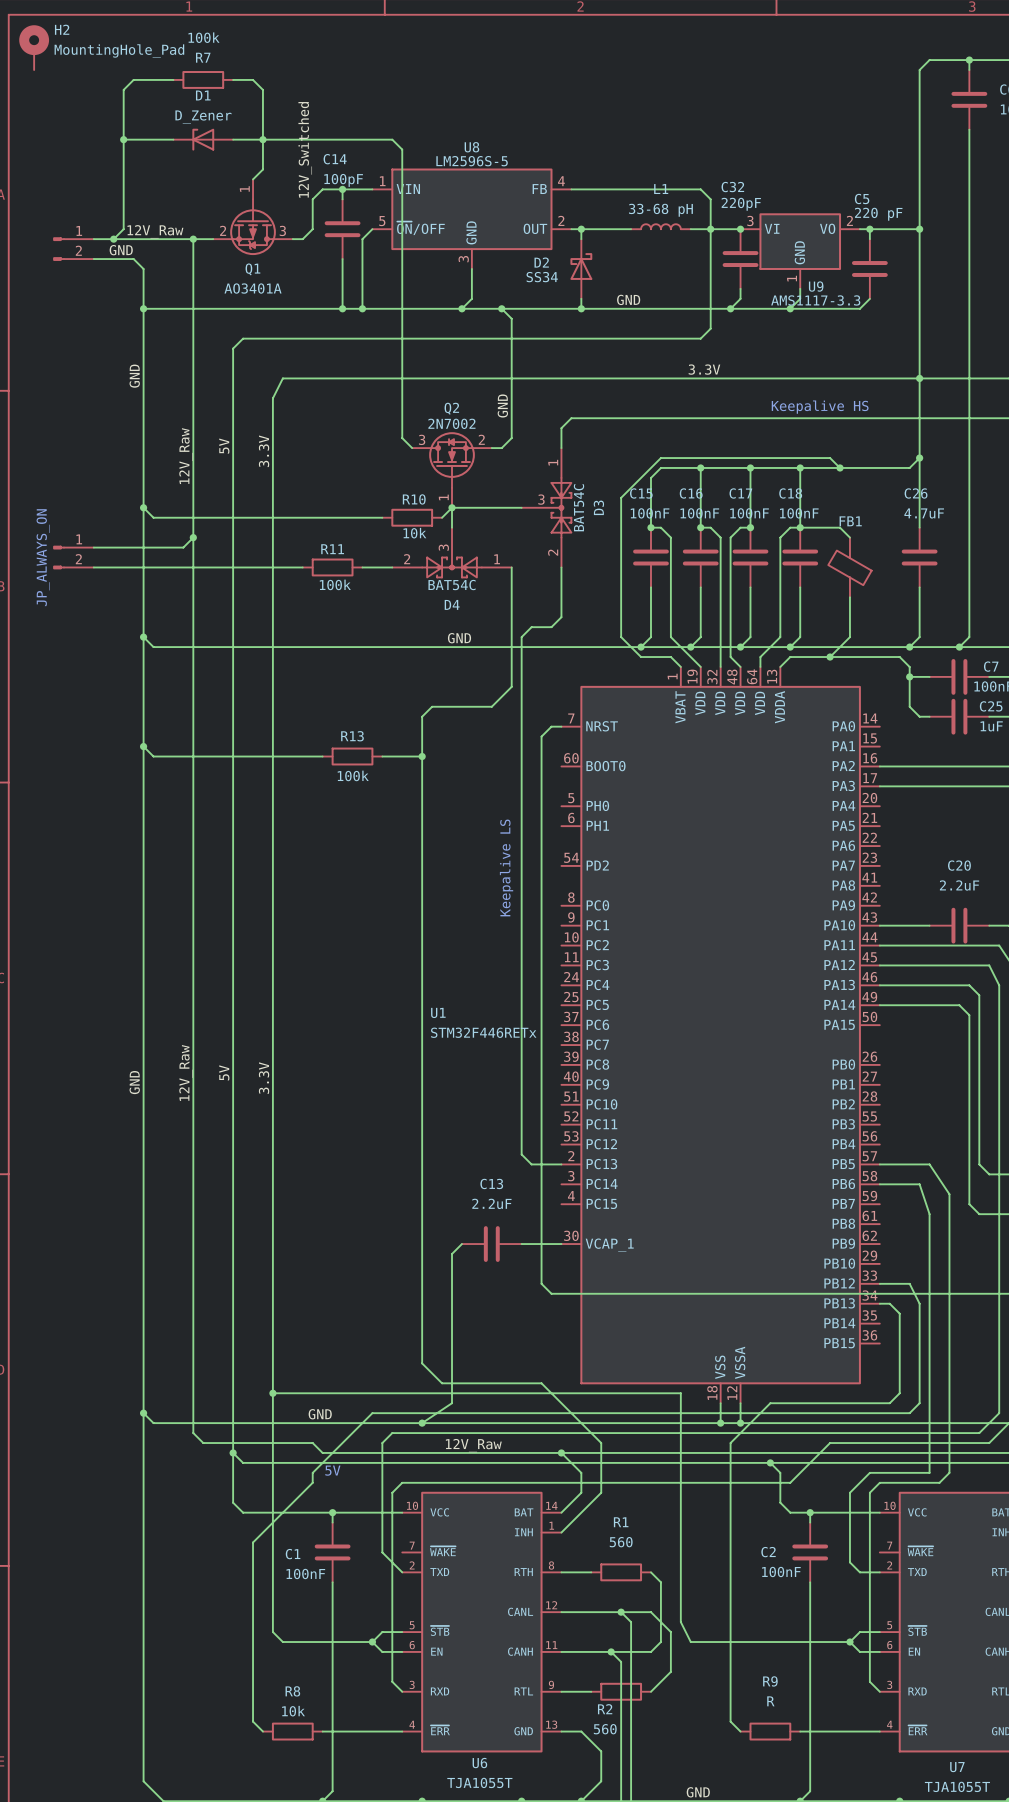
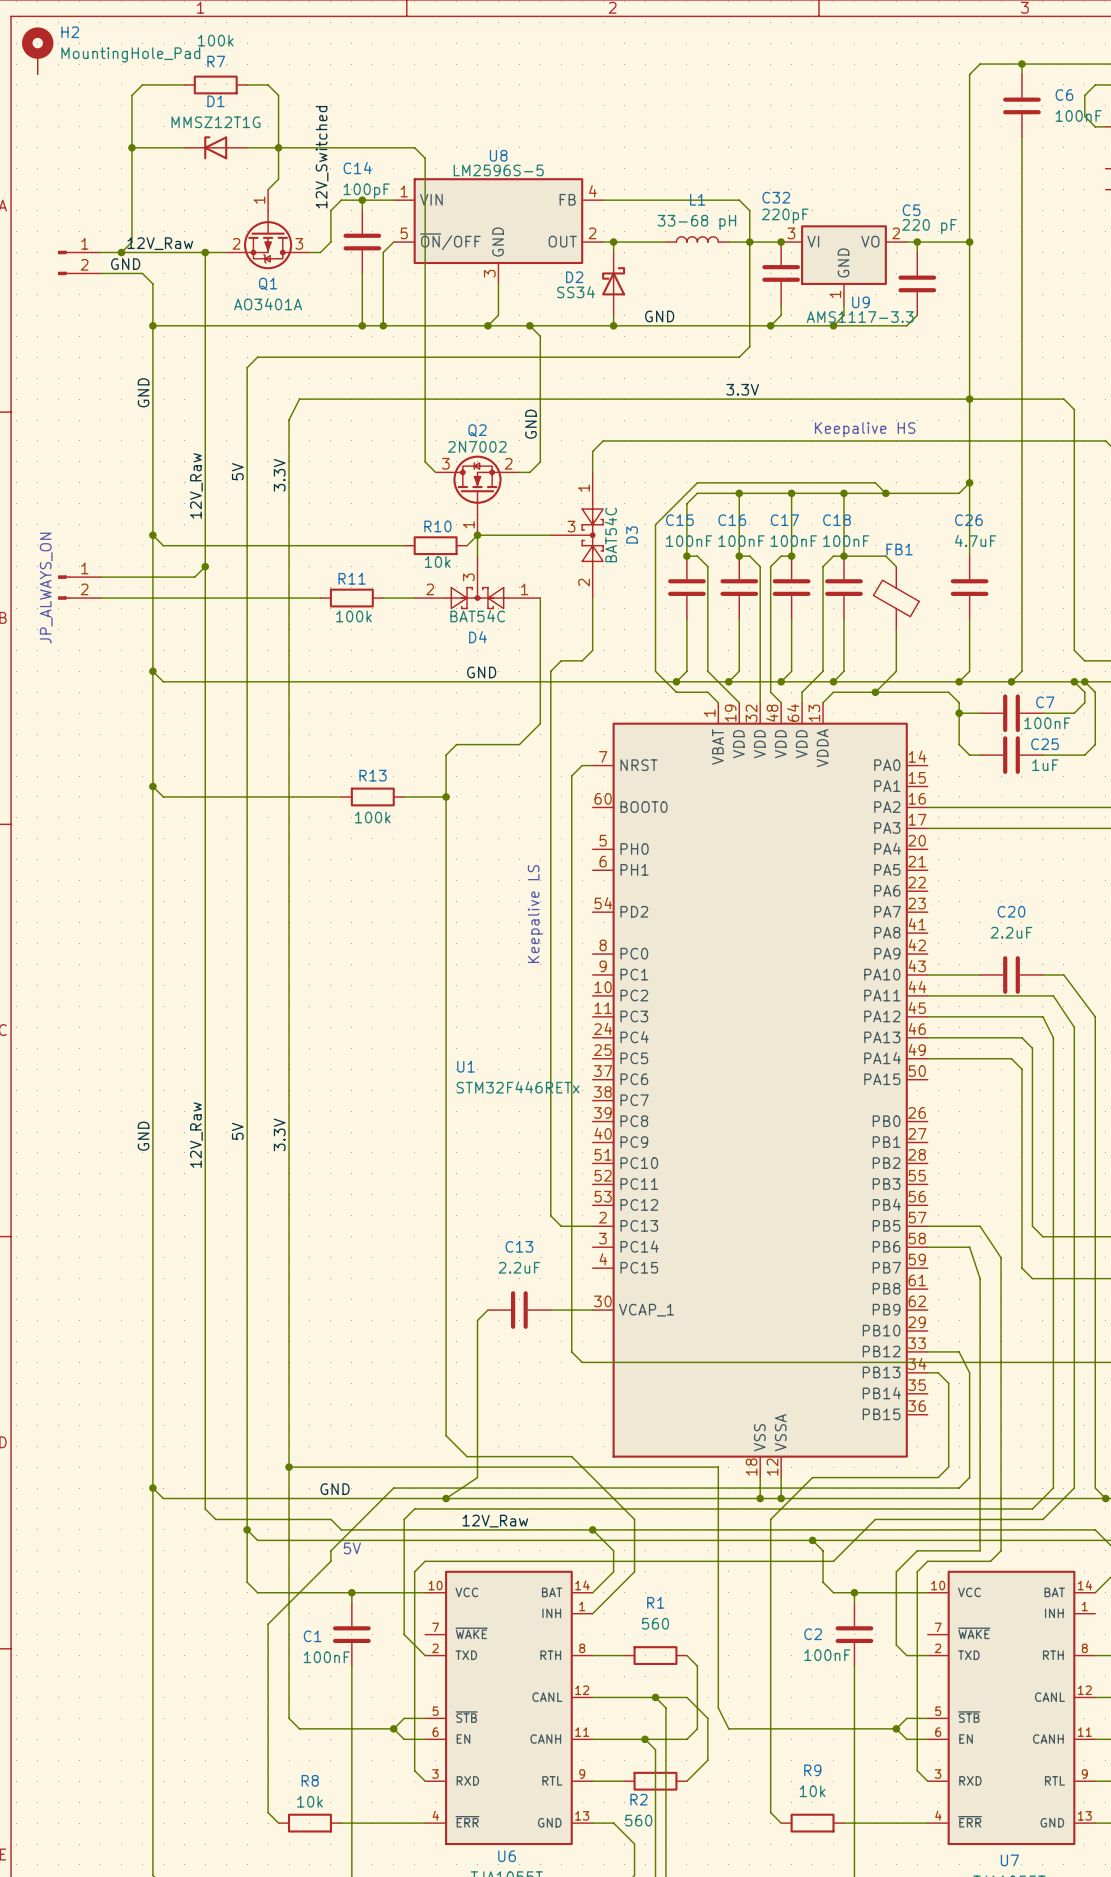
D1 value: D_Zener (203, 117) -> MMSZ12T1G (215, 122)
R9 value: R (770, 1701) -> 10k (812, 1791)

